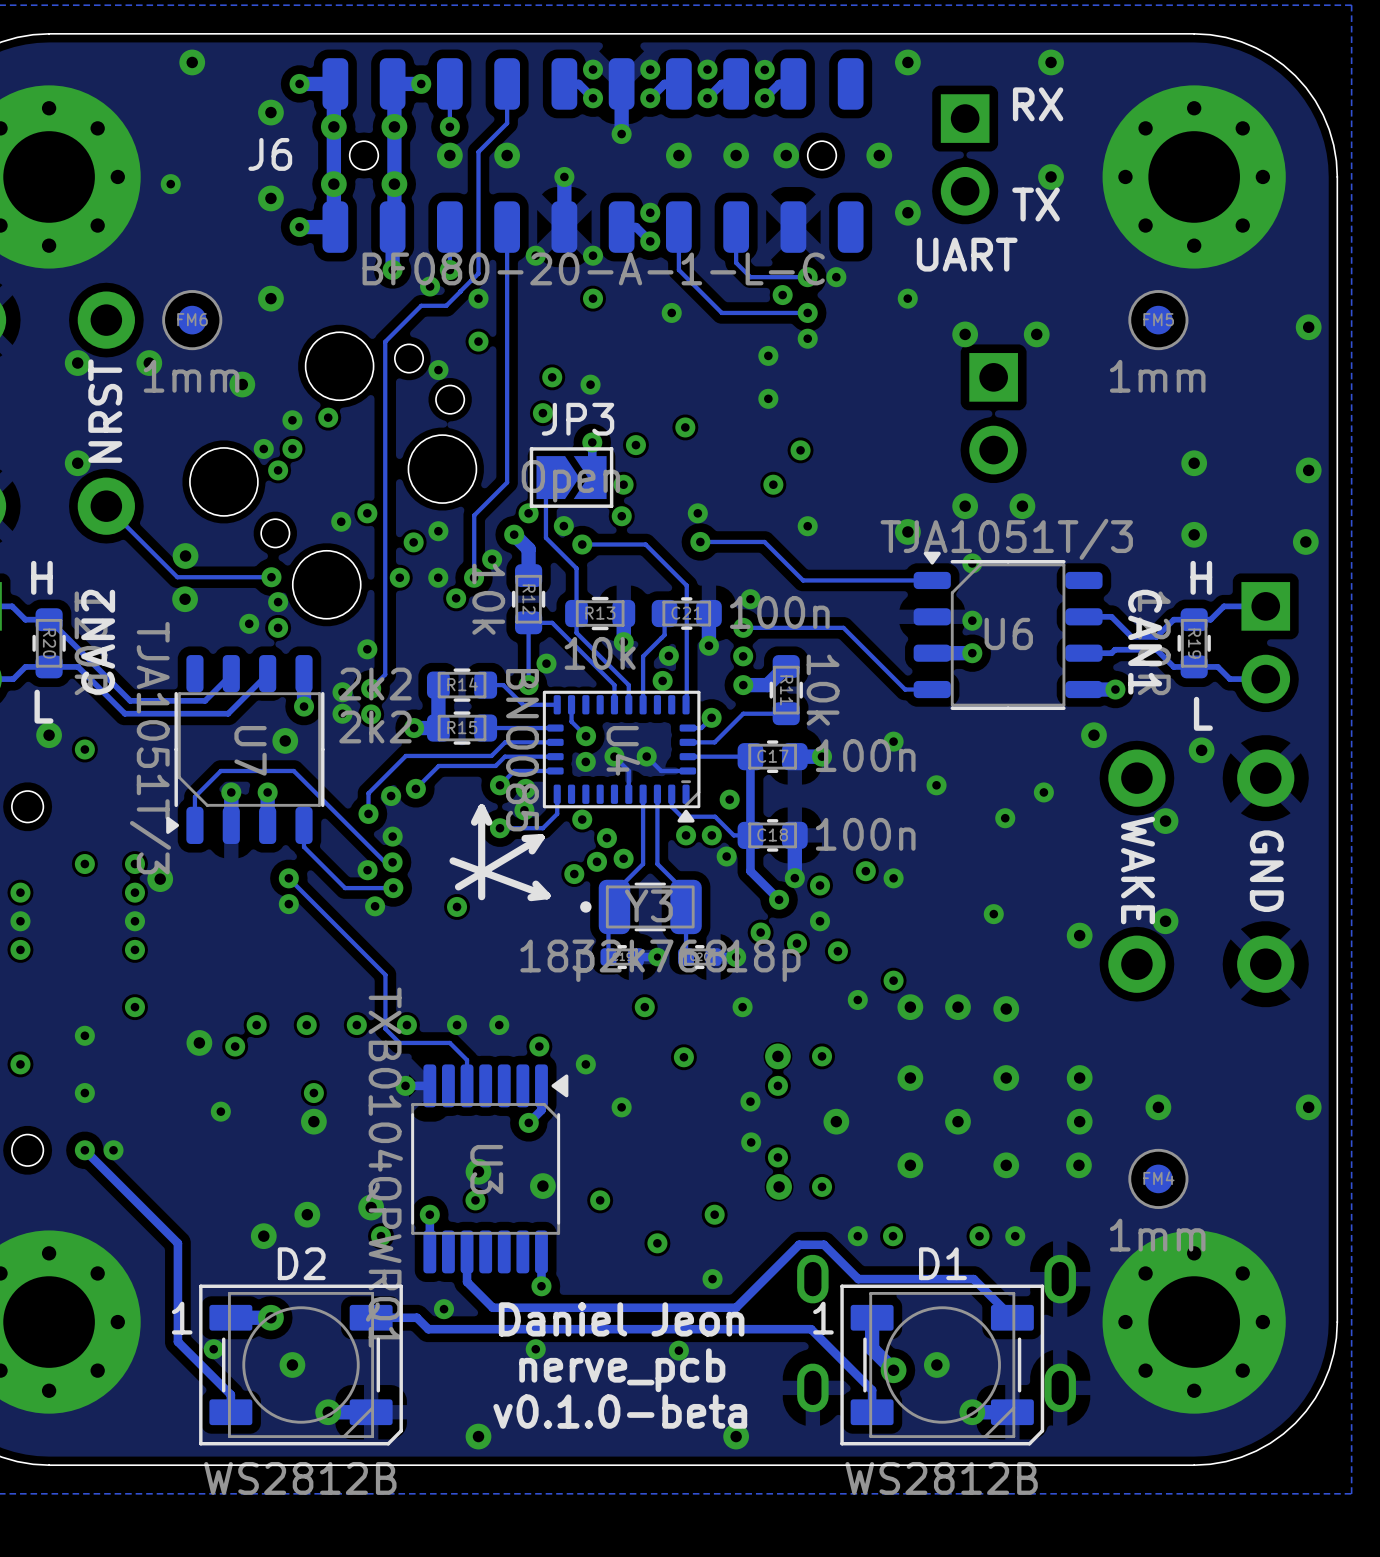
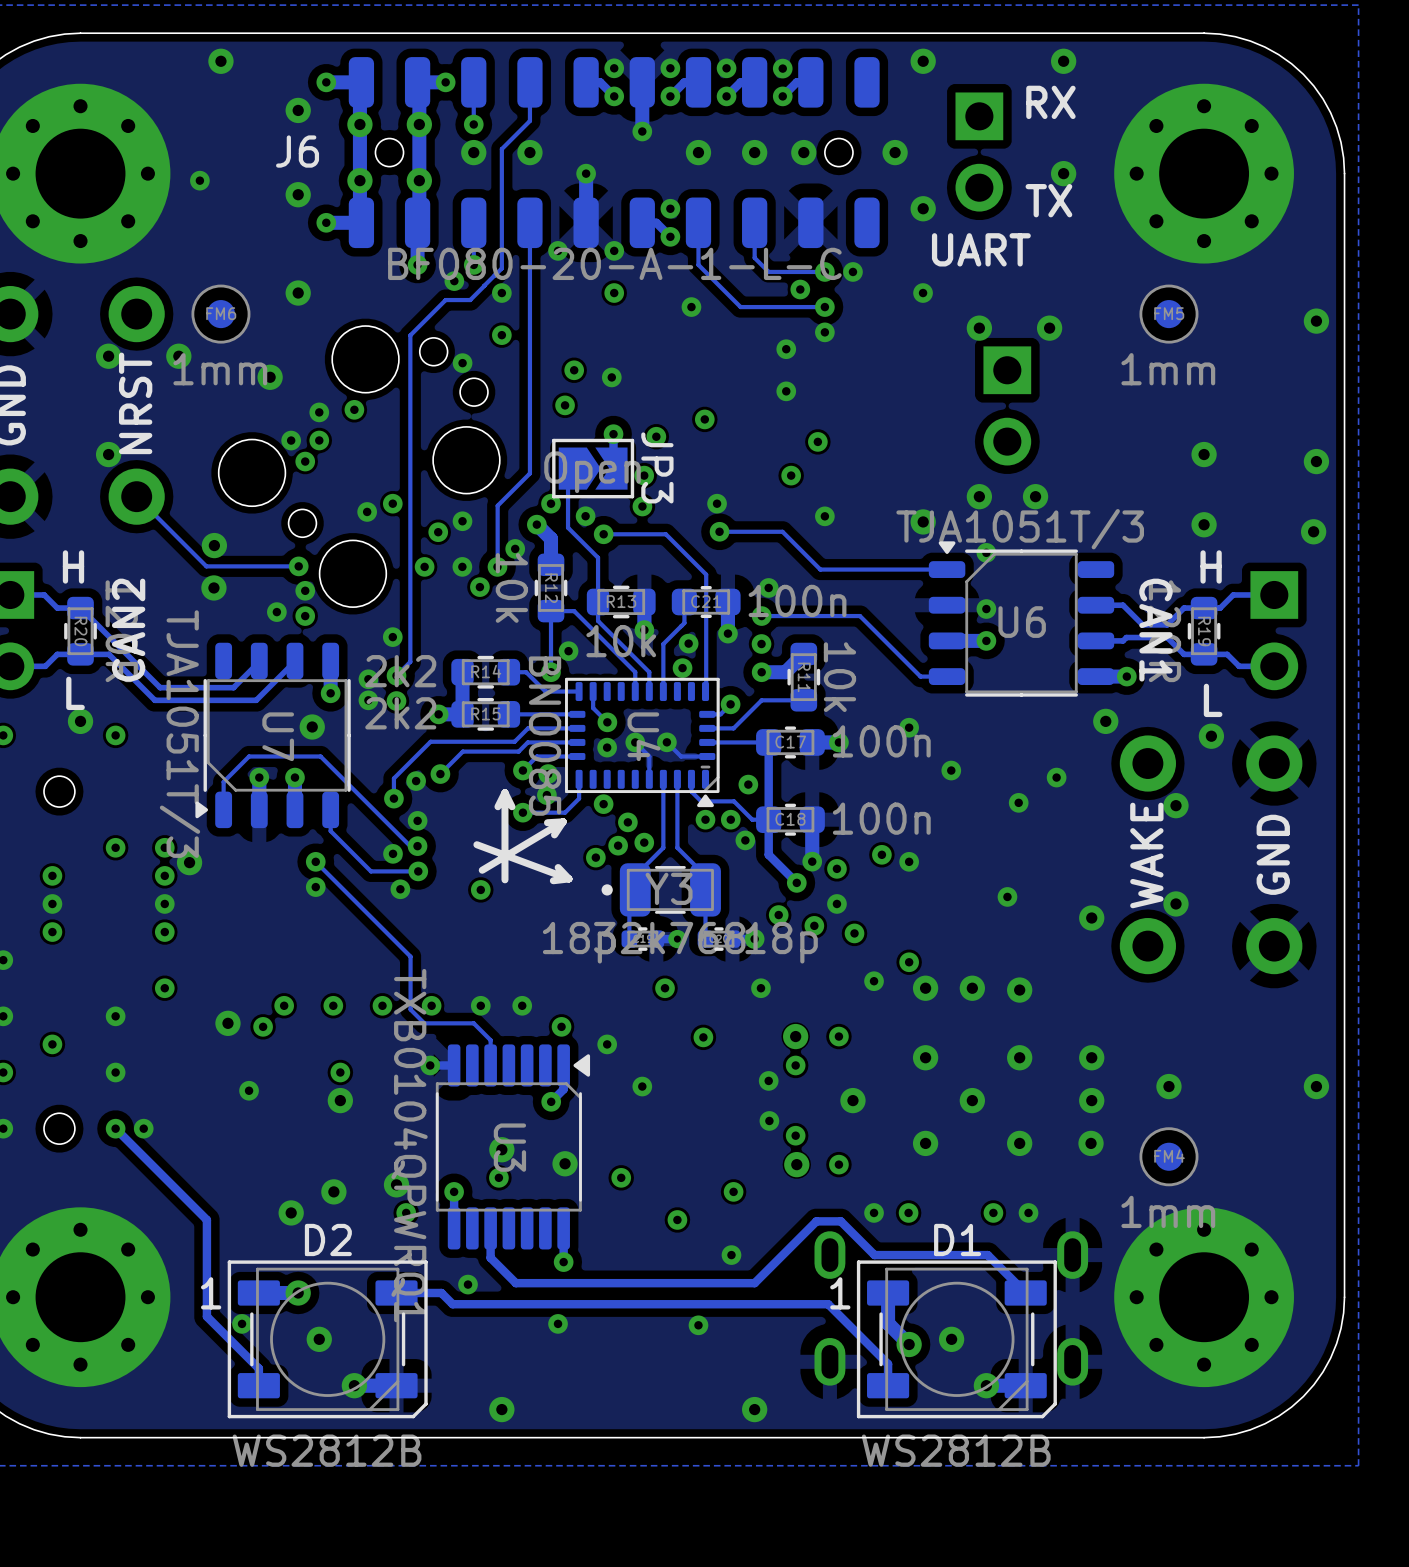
JP3 name rotation: 0° (578, 419) -> 90° clockwise (657, 467)
text rotation: 0° (1137, 870) -> 180° (1146, 855)
text rotation: 0° (1266, 871) -> 180° (1273, 854)
text: Daniel Jeon (621, 1319) -> none
text: nerve_pcb (622, 1370) -> none
text: v0.1.0-beta (620, 1411) -> none

